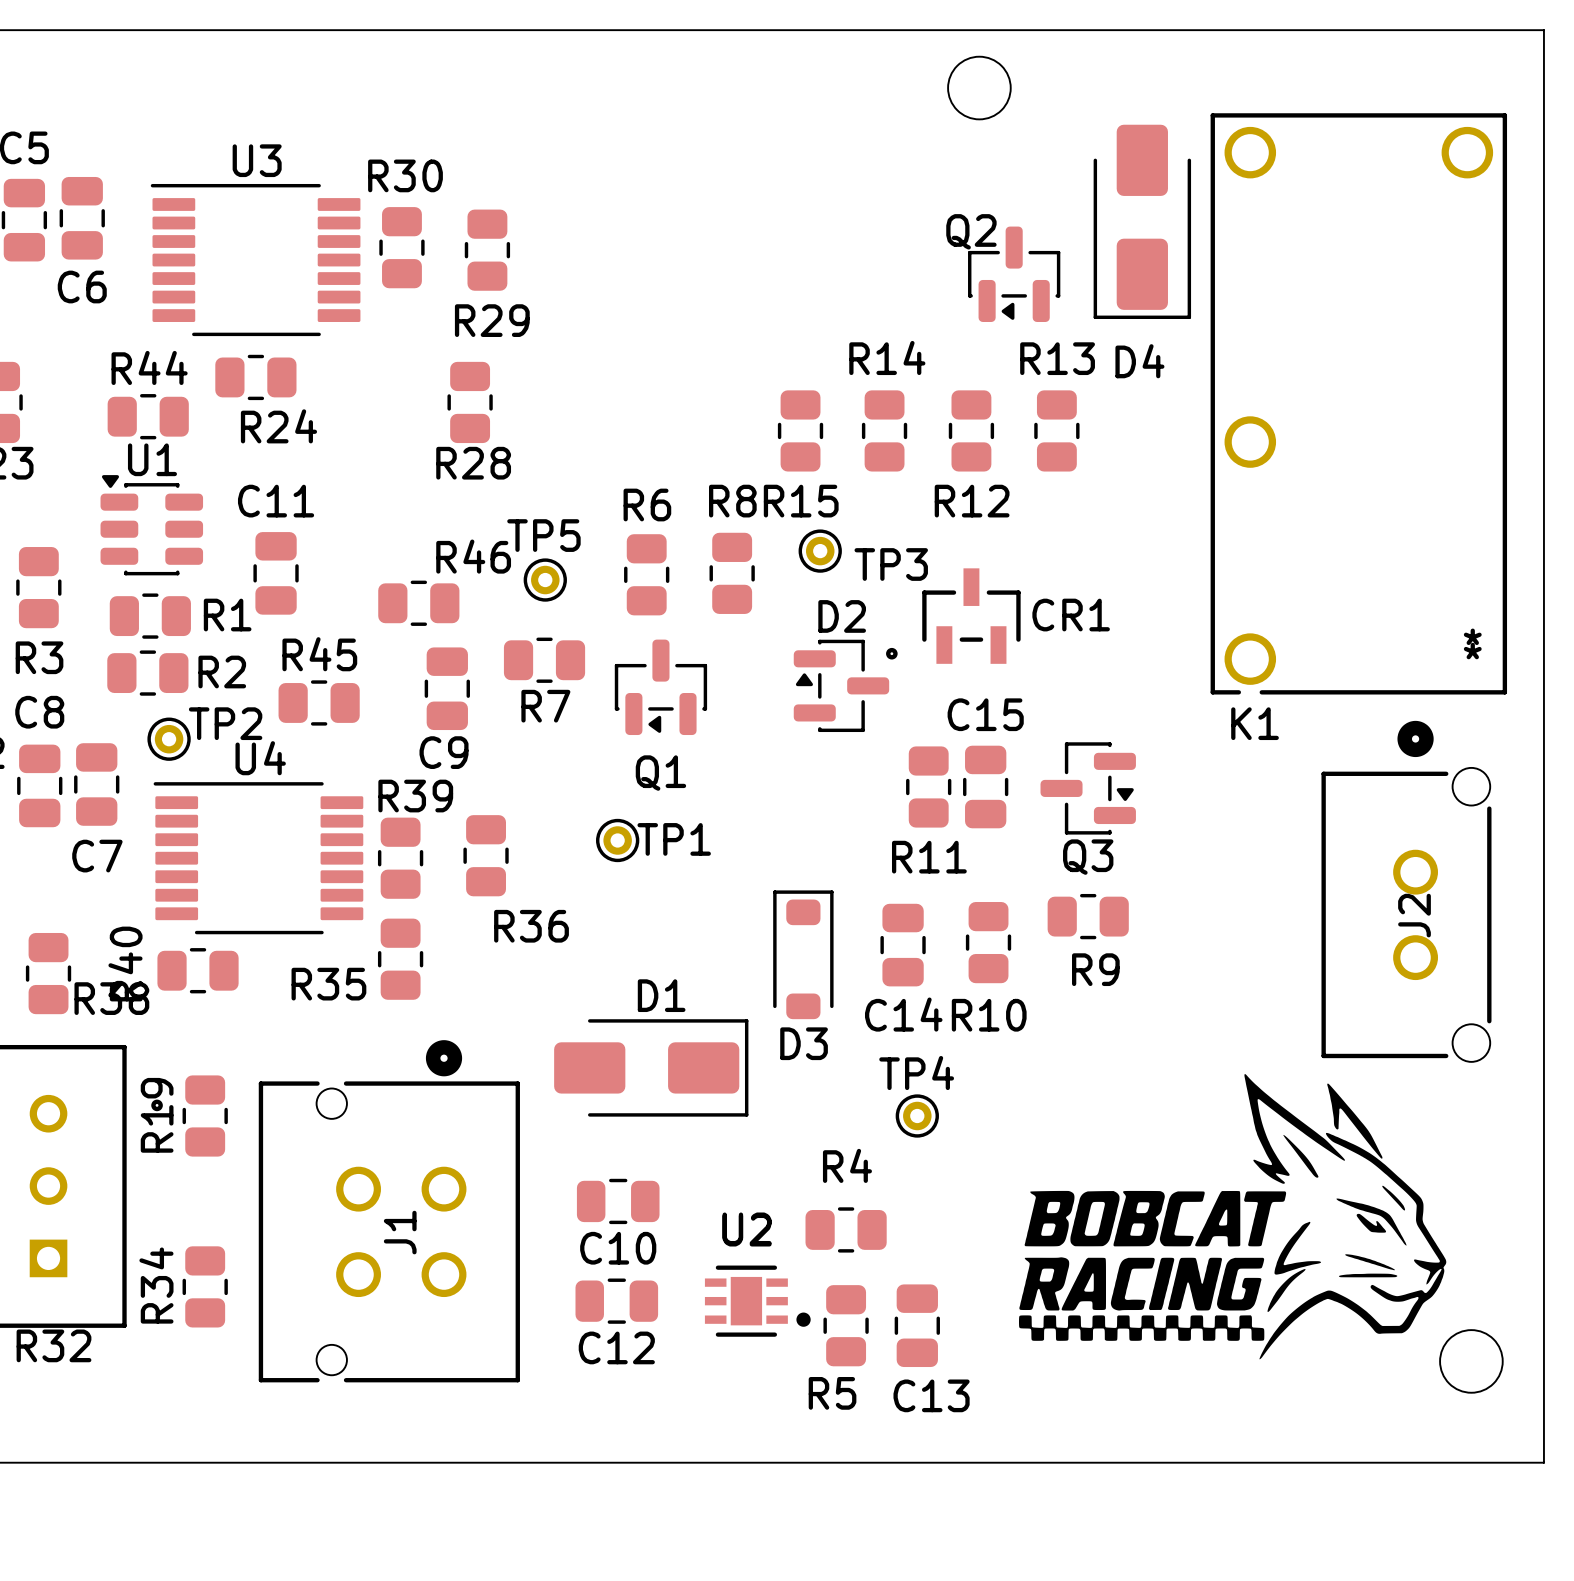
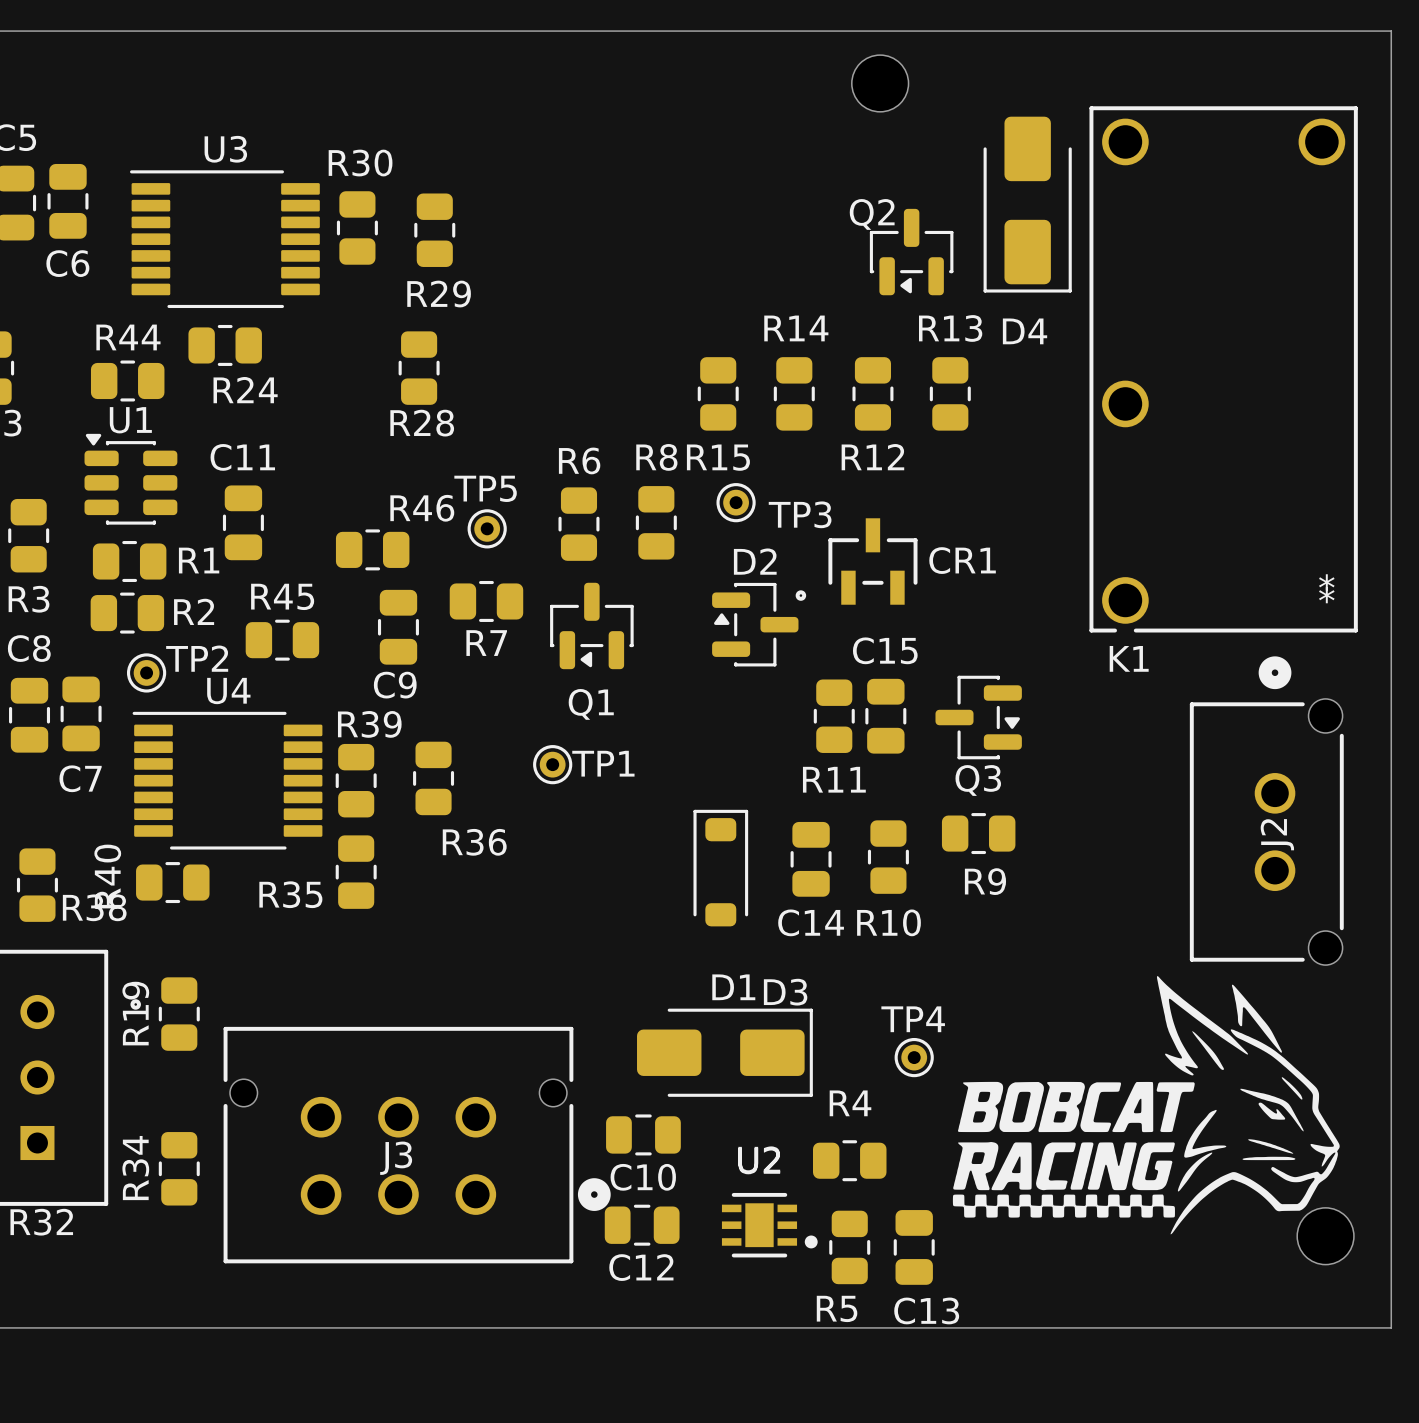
D3 name position: D3 (804, 1043) -> D3 (785, 992)
D1 position: (651, 1067) -> (724, 1052)
TP4 position: (917, 1116) -> (914, 1057)
C10 position: (618, 1201) -> (643, 1134)
J1: (389, 1211) -> none
drawing position: (1232, 1216) -> (1146, 1105)
R4 position: (846, 1229) -> (849, 1160)
J3: none -> (417, 1145)
C12 position: (616, 1301) -> (642, 1225)
part position: (757, 1301) -> (769, 1225)
R5 position: (846, 1325) -> (849, 1247)
C13 position: (917, 1325) -> (914, 1247)

